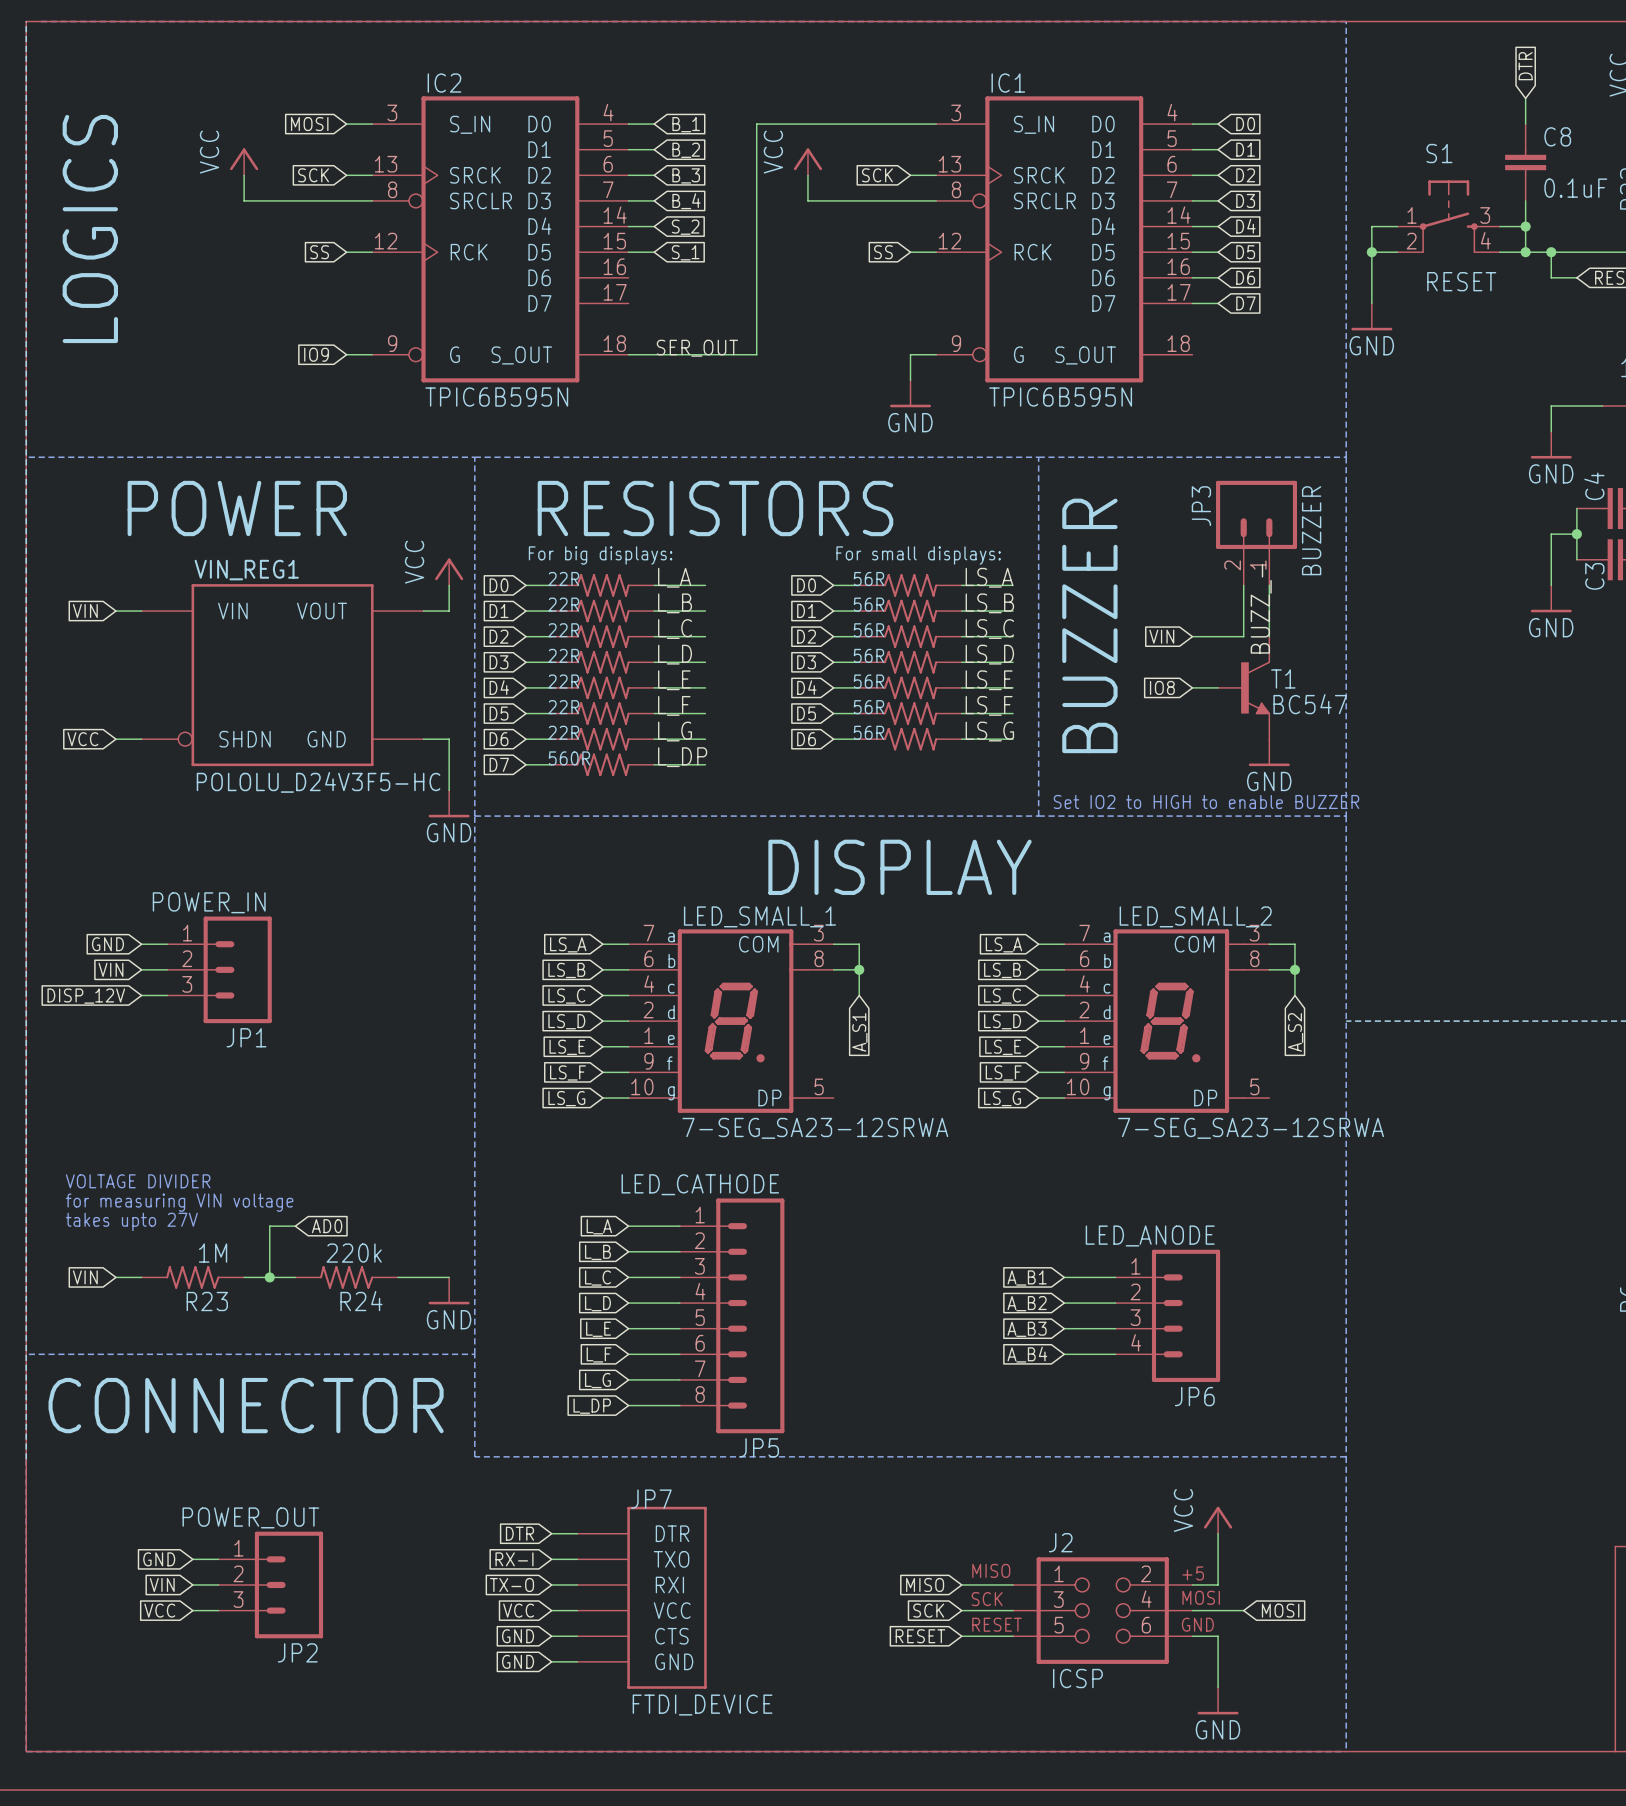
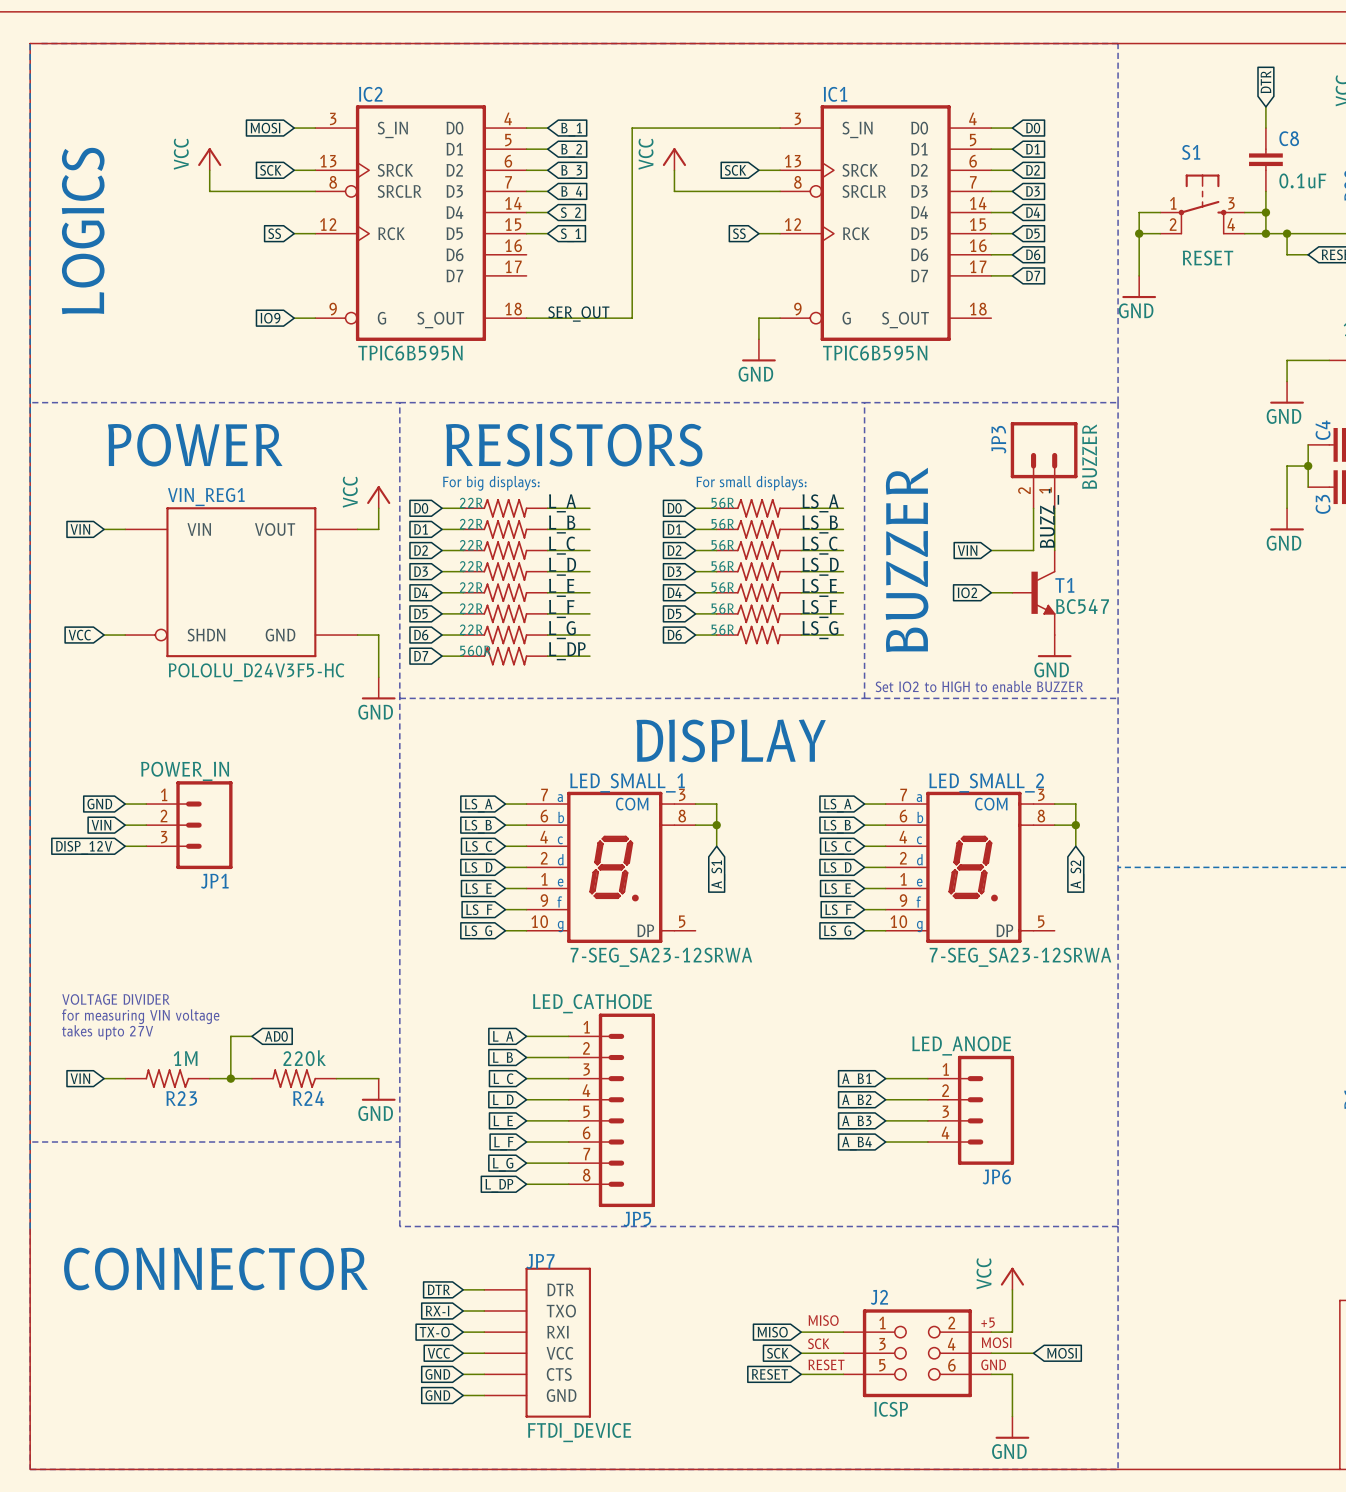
global label: IO8 (1162, 687) -> IO2 (967, 592)
text position: CONNECTOR (246, 1405) -> CONNECTOR (215, 1268)
global label: GND (159, 1559) -> none
wire: (192, 1559) (218, 1559) -> none
global label: VIN (162, 1584) -> none
wire: (192, 1584) (218, 1584) -> none
JP2: POWER_OUT (270, 1584) -> none
global label: VCC (159, 1610) -> none
wire: (192, 1610) (218, 1610) -> none

